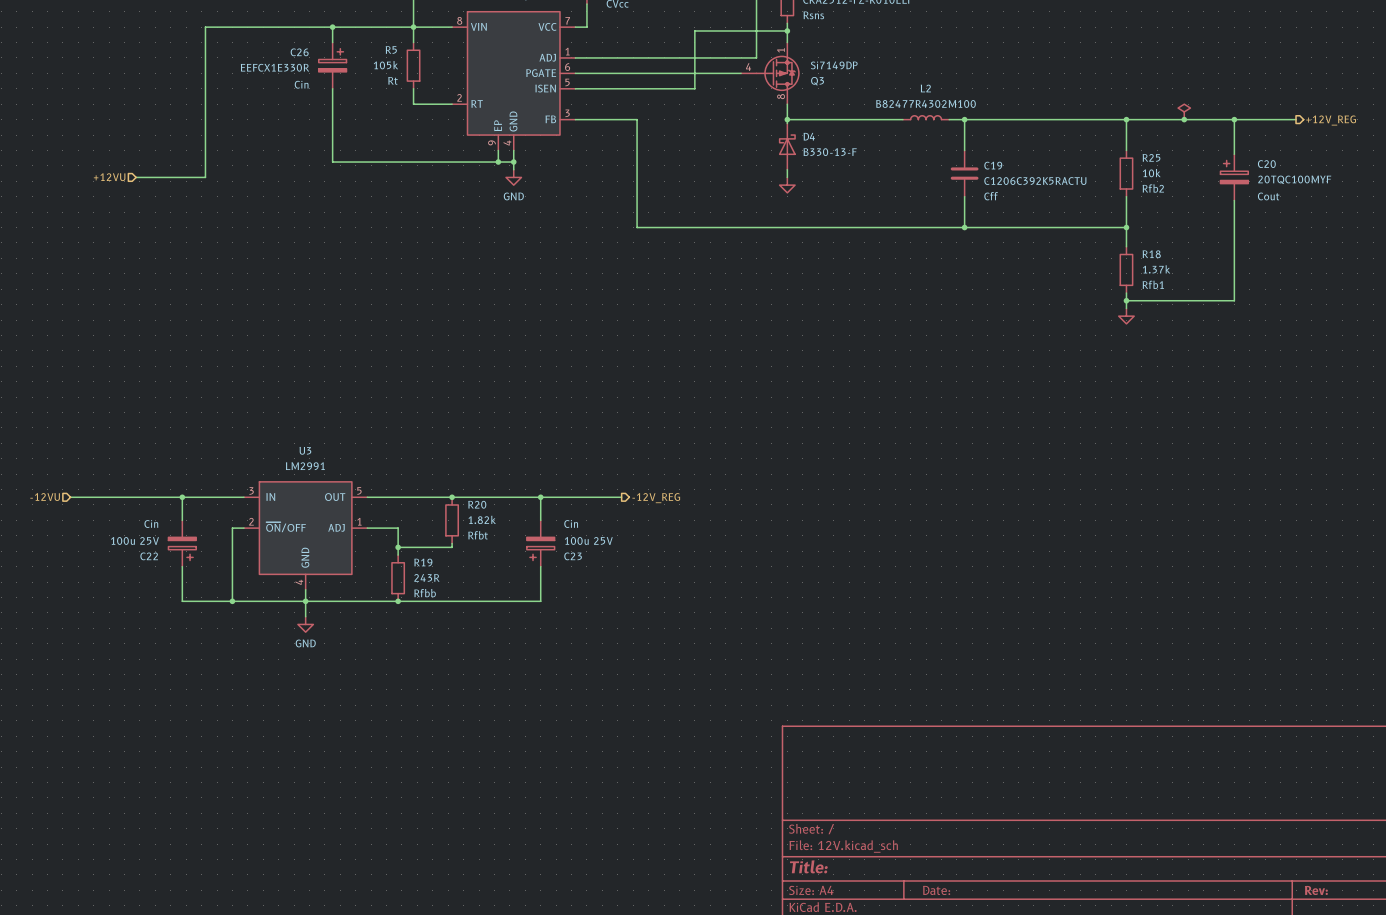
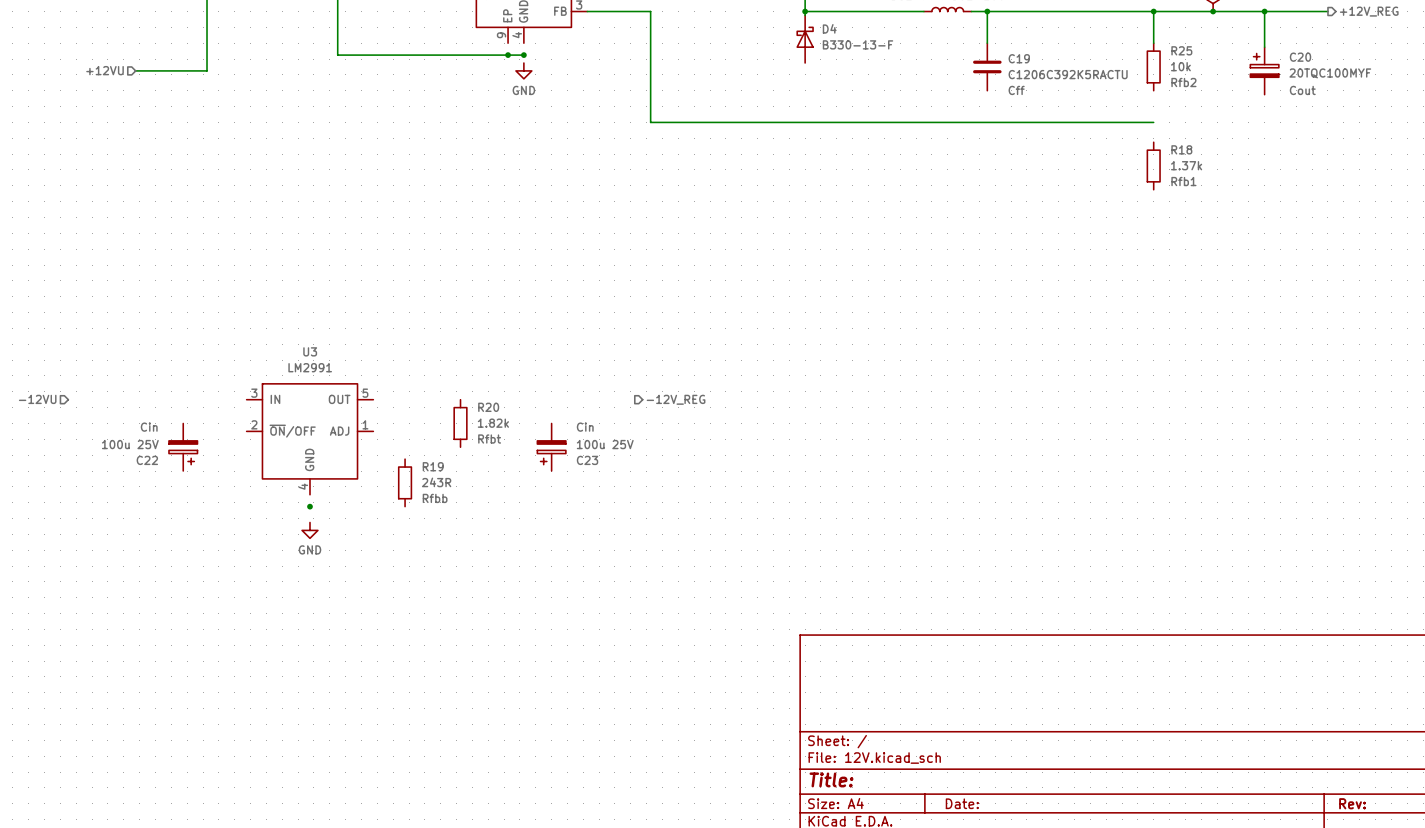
wire: (498, 150) (498, 162) -> none
wire: (513, 150) (513, 169) -> none
wire: (787, 169) (787, 177) -> none
power symbol: (787, 185) -> none
wire: (964, 196) (964, 227) -> none
wire: (1126, 196) (1126, 246) -> none
wire: (1234, 200) (1234, 300) (1126, 300) -> none
junction: (964, 227) -> none
junction: (1126, 227) -> none
wire: (1126, 293) (1126, 308) -> none
junction: (1126, 300) -> none
power symbol: (1126, 316) -> none
wire: (70, 497) (243, 497) -> none
wire: (182, 497) (182, 520) -> none
junction: (182, 497) -> none
wire: (367, 497) (621, 497) -> none
junction: (452, 497) -> none
wire: (540, 497) (540, 520) -> none
junction: (540, 497) -> none
wire: (243, 528) (232, 528) (232, 601) -> none
wire: (367, 528) (398, 528) (398, 555) -> none
wire: (452, 543) (452, 547) (398, 547) -> none
junction: (398, 547) -> none
wire: (182, 566) (182, 601) (540, 601) (540, 566) -> none
wire: (305, 589) (305, 616) -> none
junction: (232, 601) -> none
junction: (398, 601) -> none

